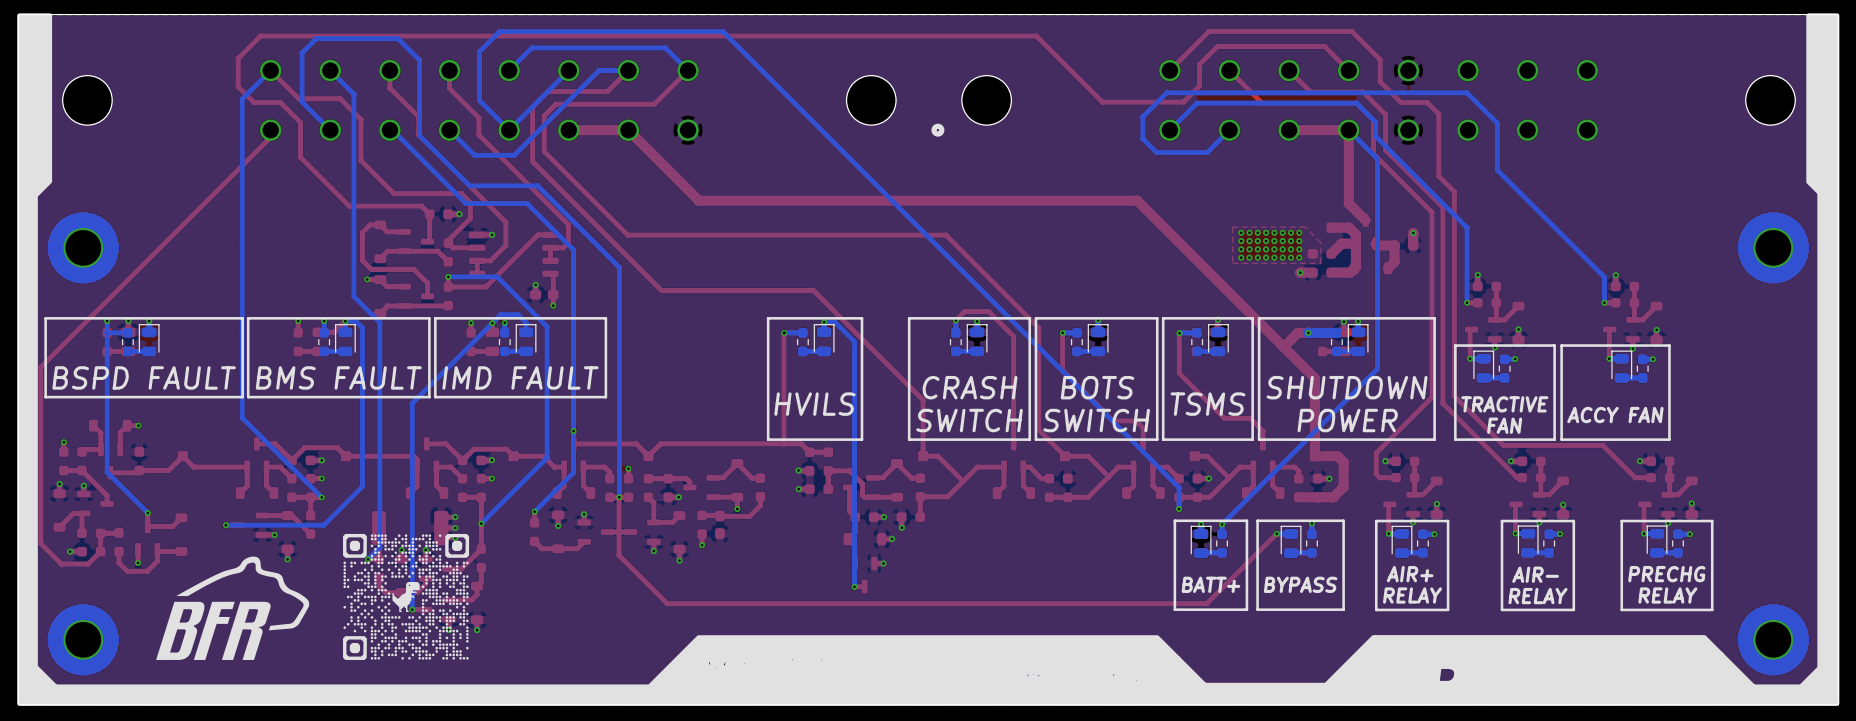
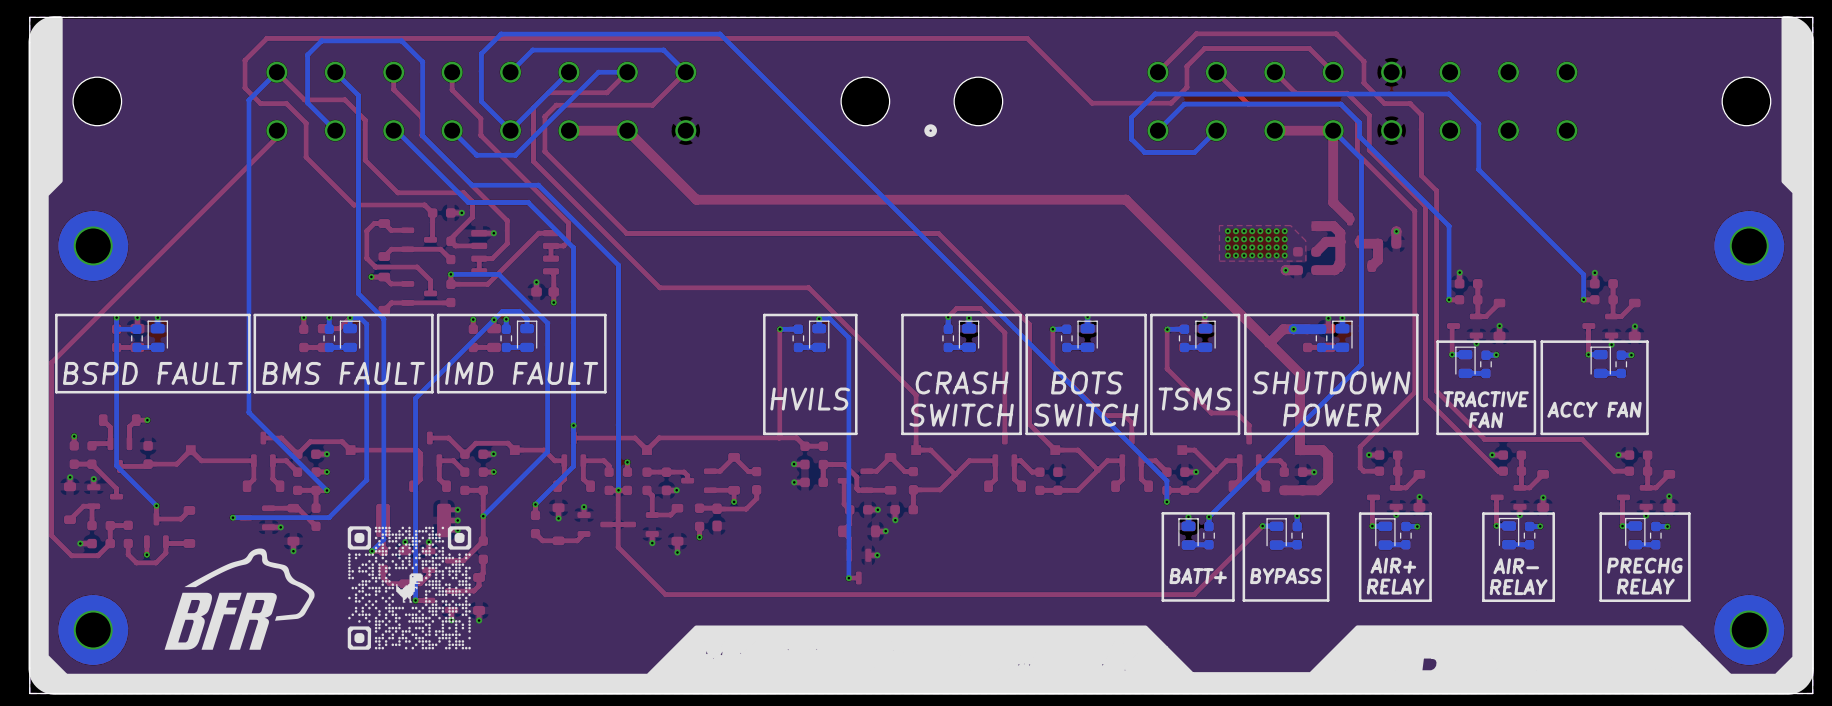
drawing shape: [17, 13, 1840, 706] -> [28, 16, 1814, 695]

